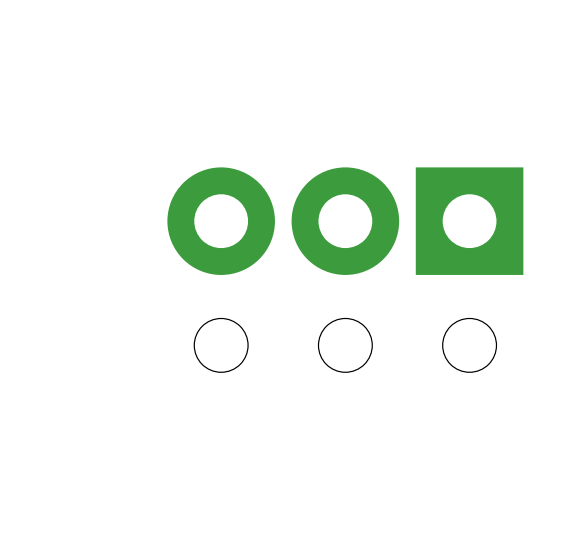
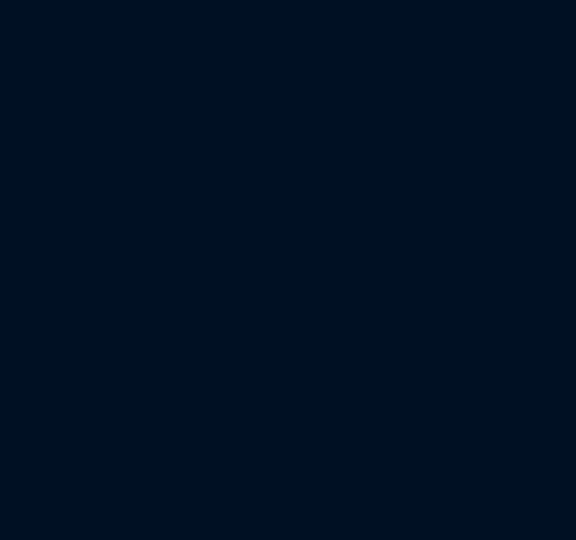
part: (345, 269) -> none

